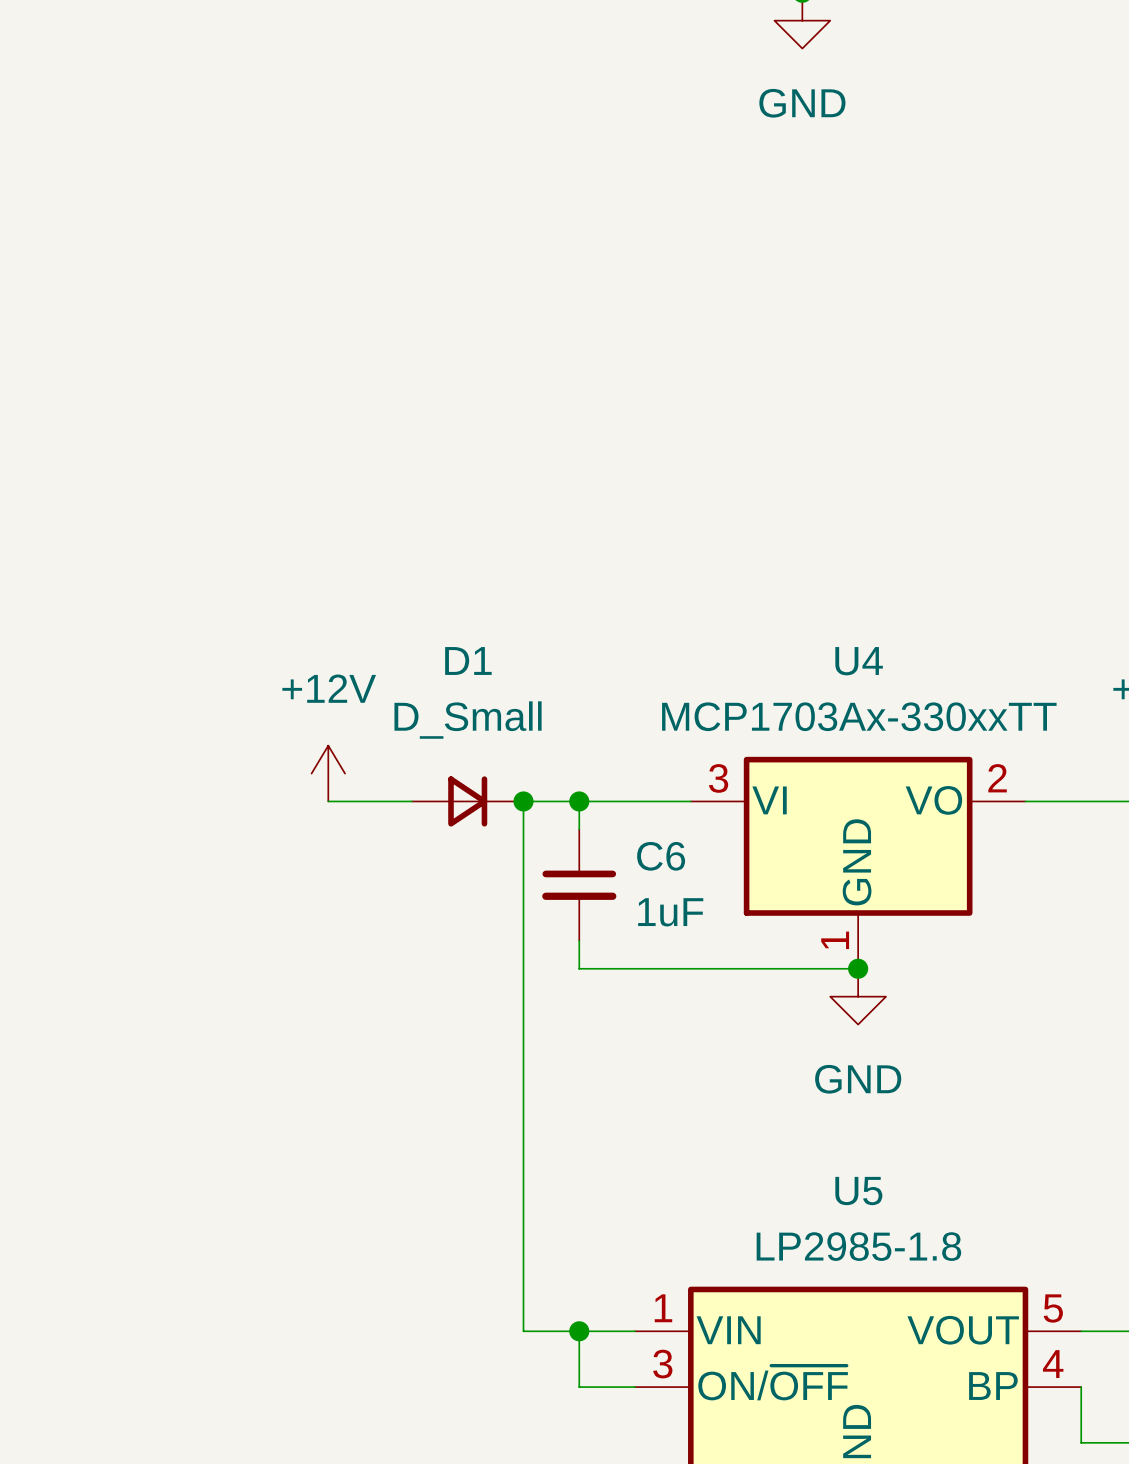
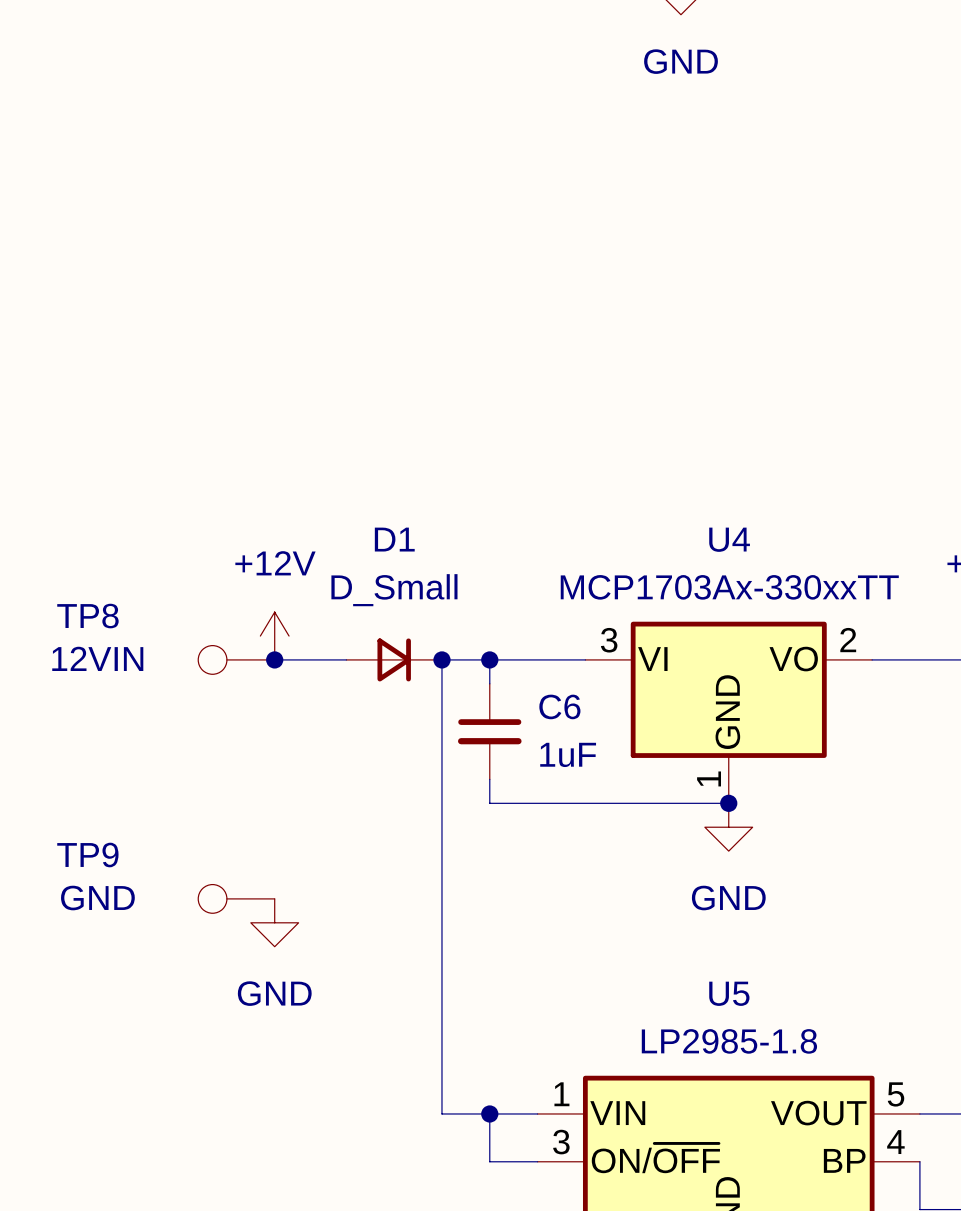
TP8: none -> 12VIN (236, 659)
junction: none -> (274, 659)
TP9: none -> GND (236, 898)
power symbol: none -> GND (274, 922)

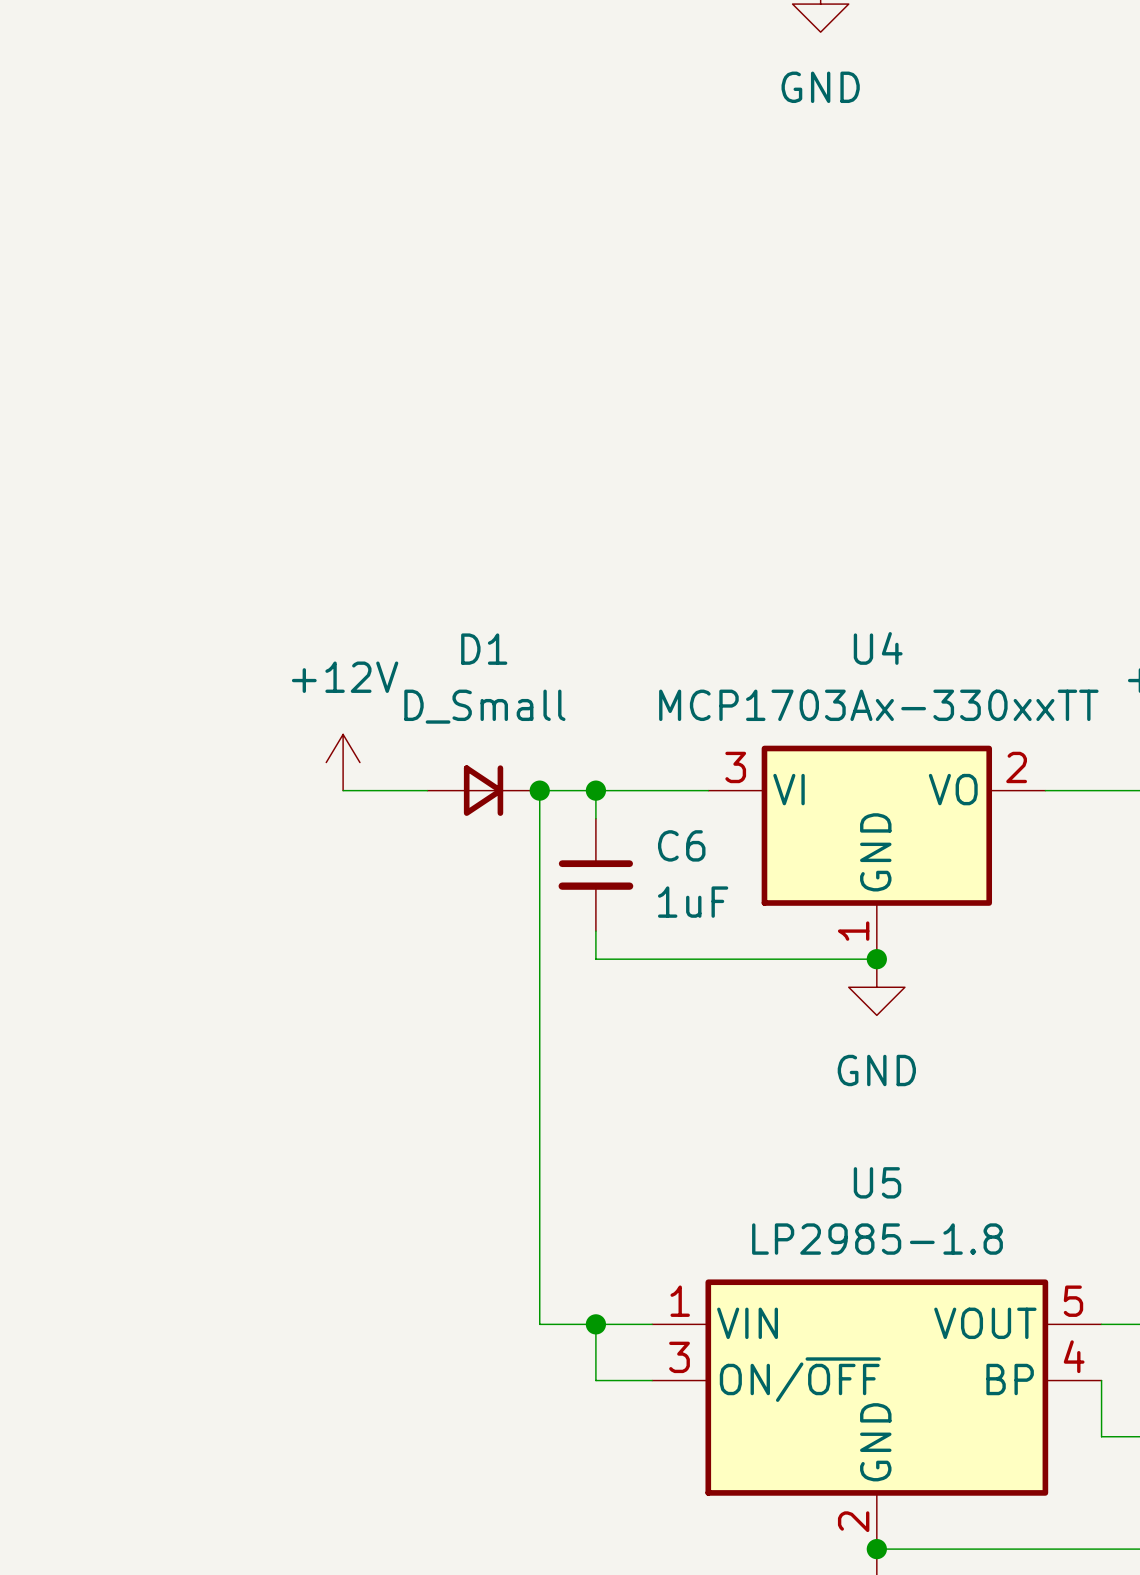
TP8: 12VIN (236, 659) -> none
junction: (274, 659) -> none
TP9: GND (236, 898) -> none
power symbol: GND (274, 922) -> none

